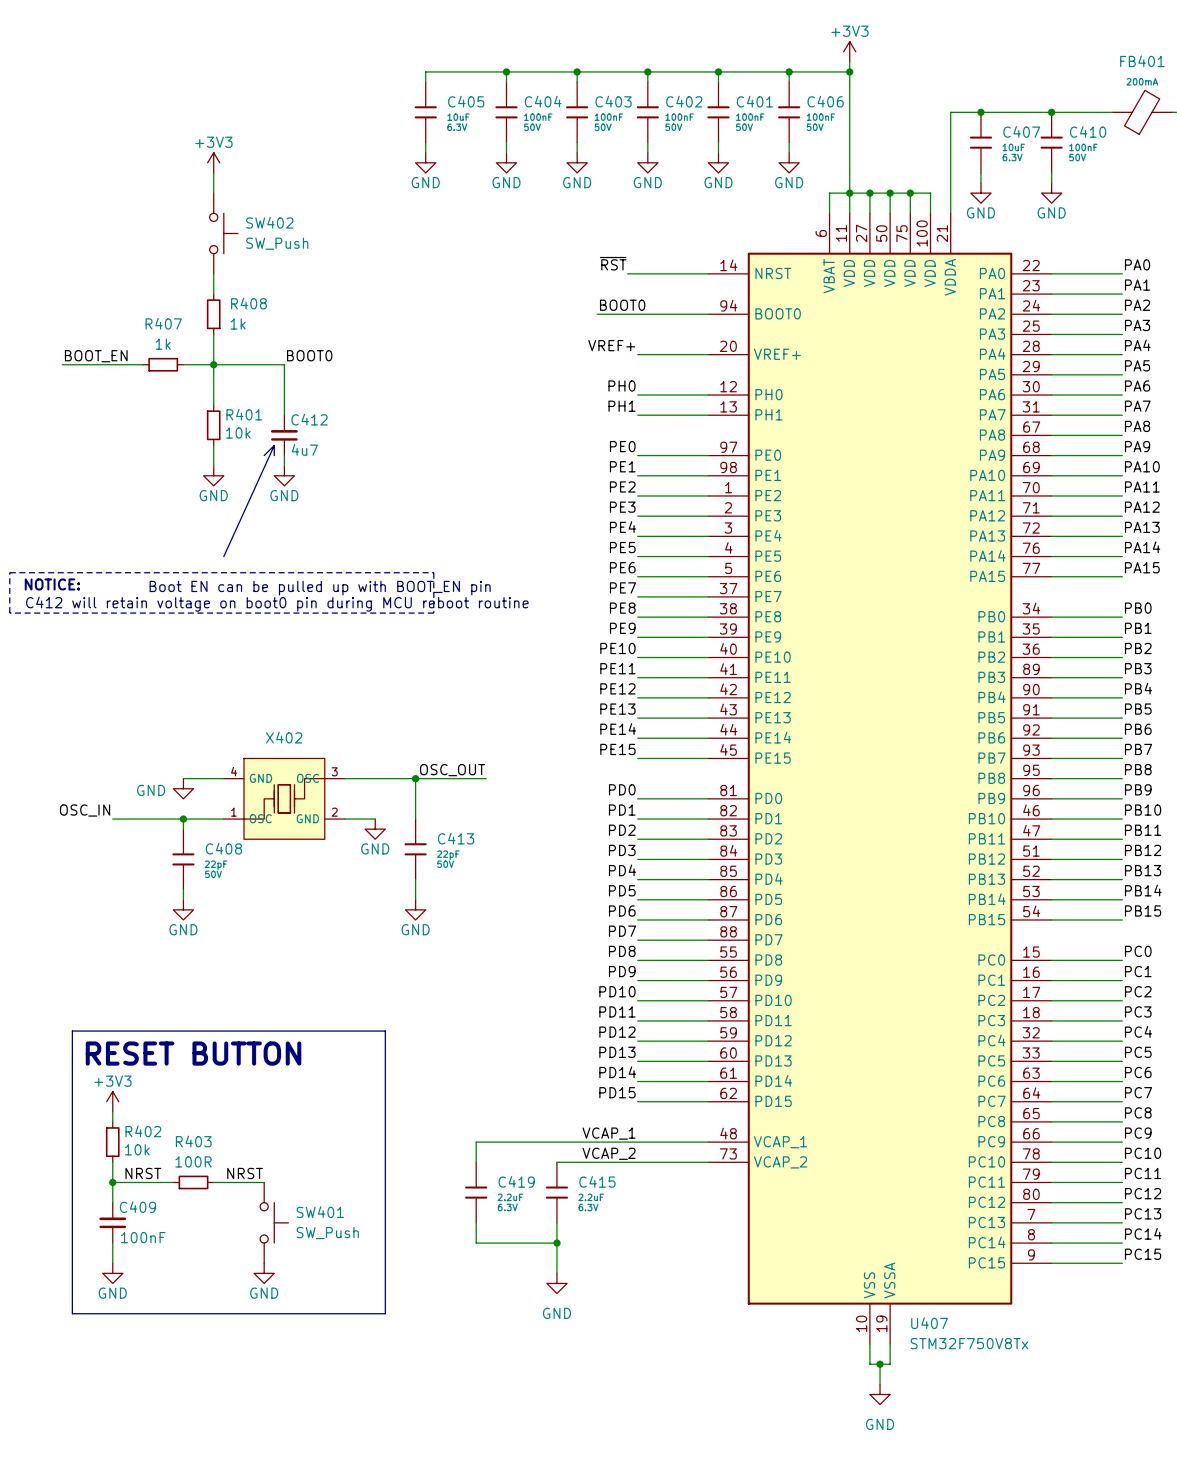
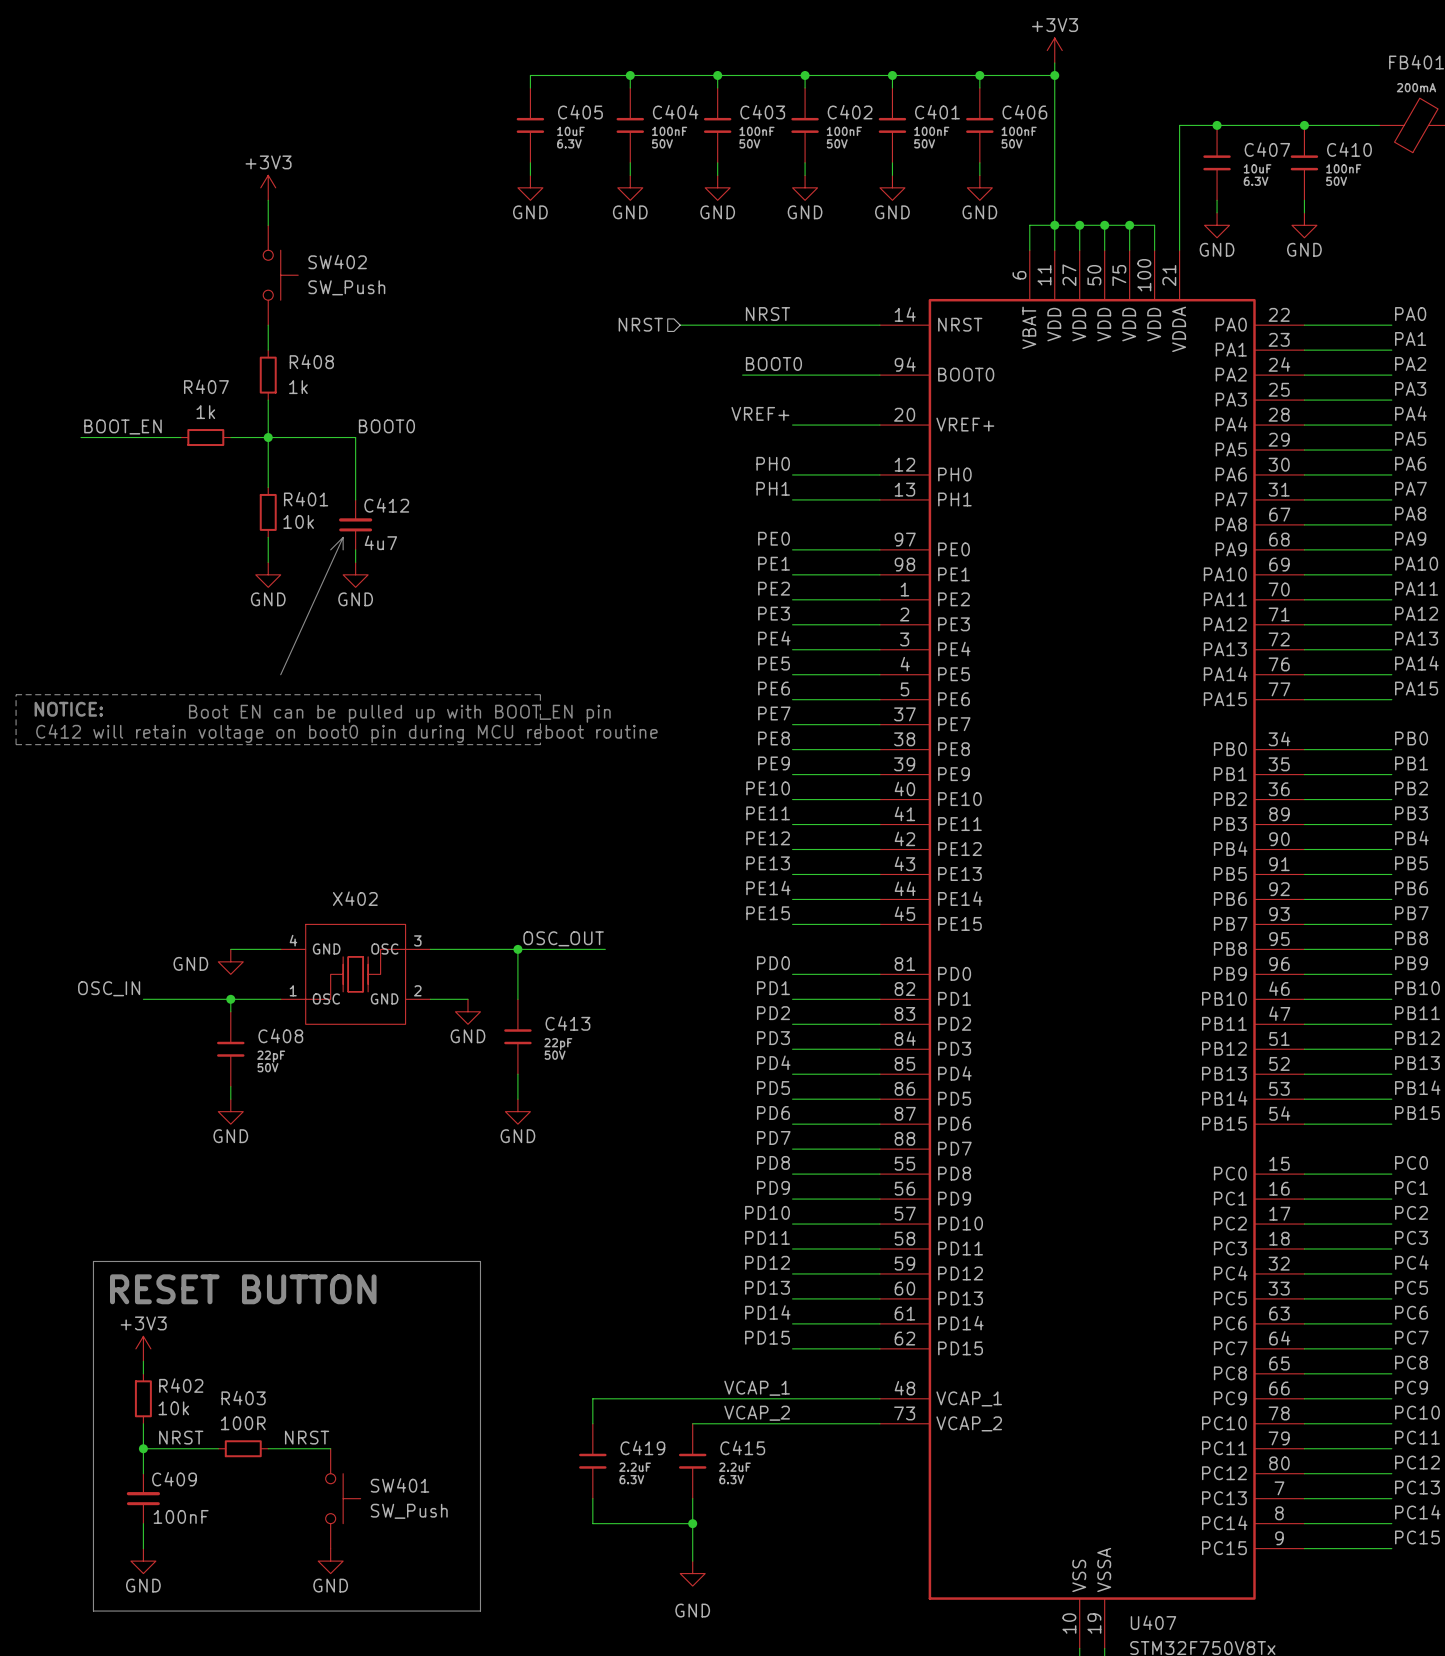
label: ~{RST} (613, 263) -> none
label: none -> NRST (768, 314)
hierarchical label: none -> NRST (640, 324)
wire: none -> (680, 325) (780, 325)

